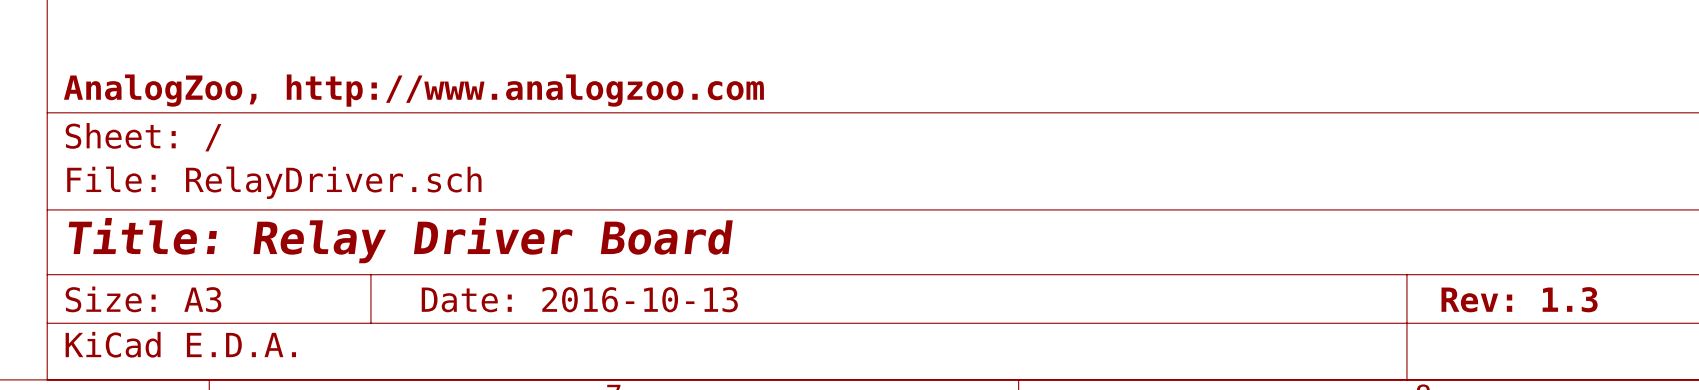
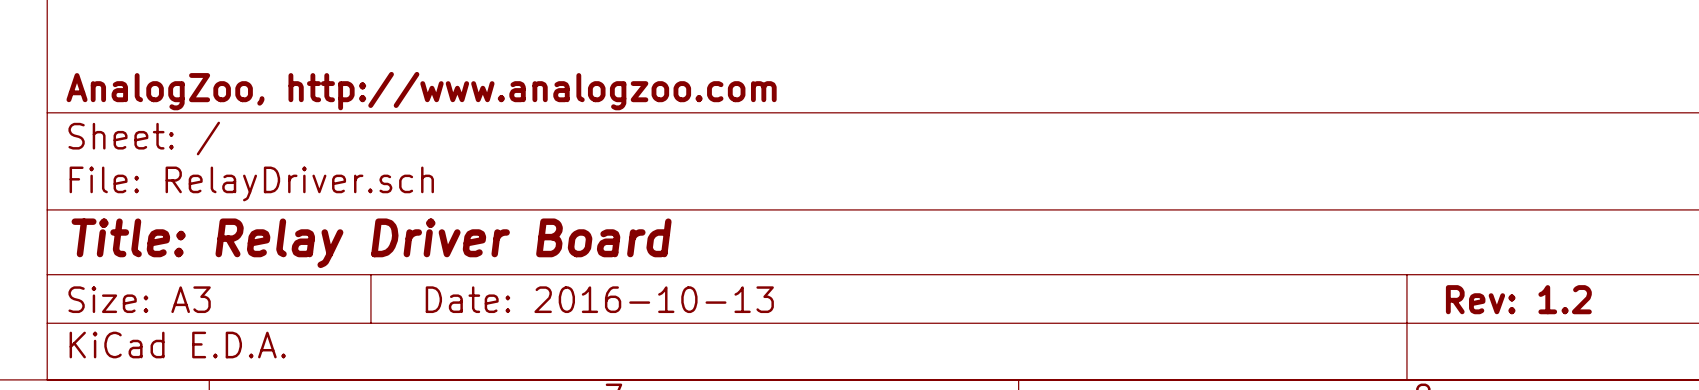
title block: Rev: 1.3 (1519, 299) -> Rev: 1.2 (1518, 299)

